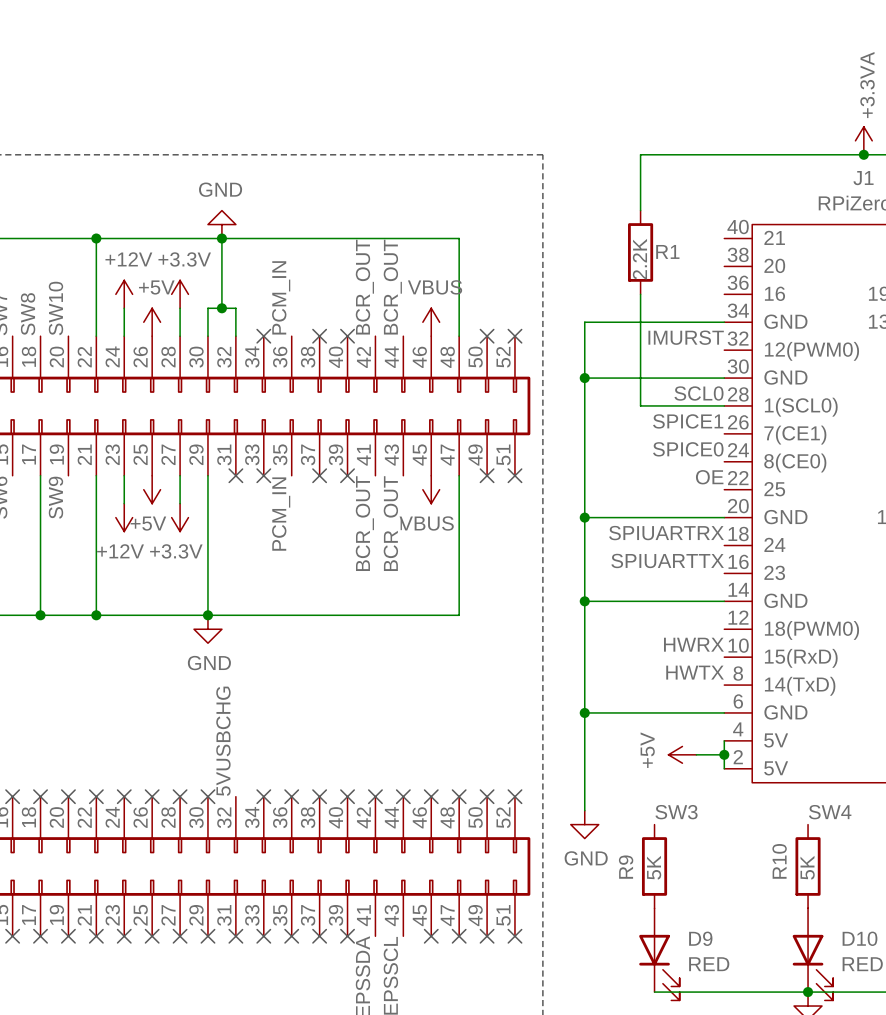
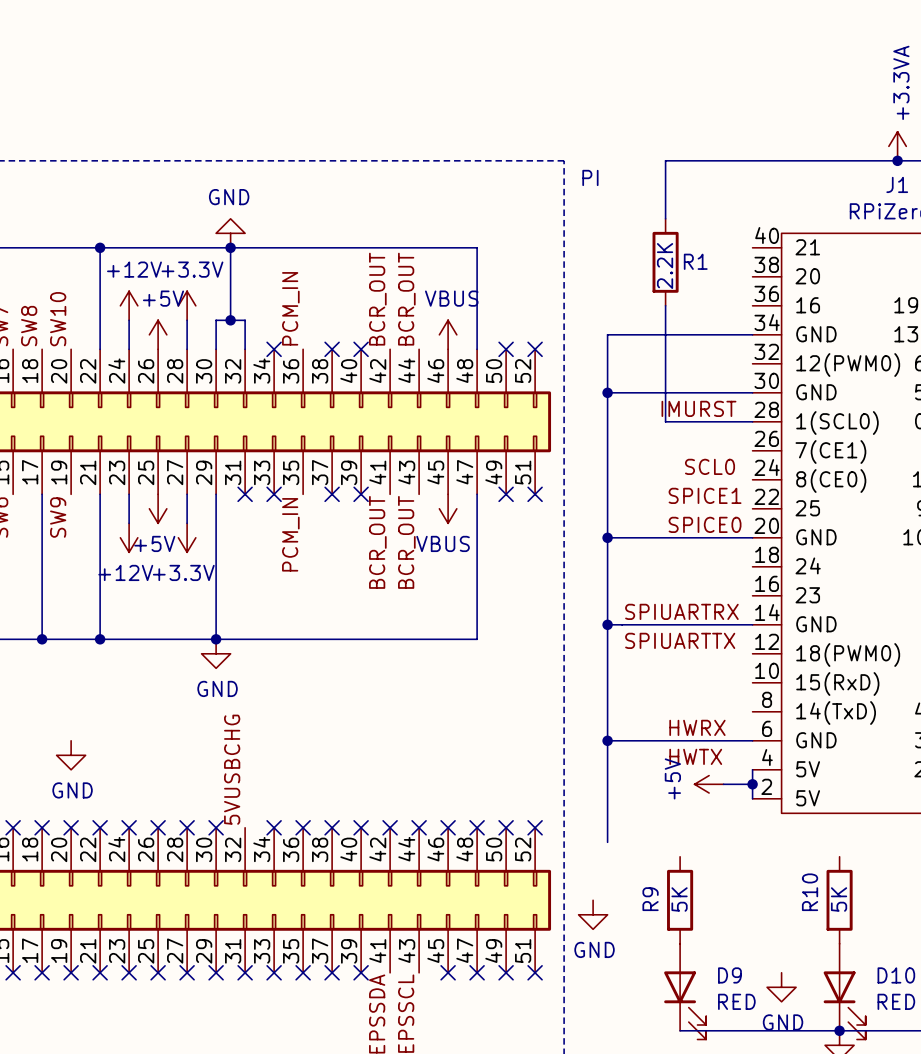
text: none -> PI (590, 177)
label position: IMURST (686, 337) -> IMURST (698, 408)
label position: SCL0 (698, 393) -> SCL0 (710, 466)
label position: SPICE1 (688, 421) -> SPICE1 (705, 495)
label position: SPICE0 (688, 449) -> SPICE0 (705, 524)
label: OE (709, 477) -> none
label position: SPIUARTRX (666, 533) -> SPIUARTRX (681, 611)
label position: SPIUARTTX (667, 560) -> SPIUARTTX (680, 640)
label position: HWRX (693, 644) -> HWRX (697, 727)
label position: HWTX (695, 672) -> HWTX (695, 756)
power symbol: none -> GND (71, 755)
label: SW3 (676, 812) -> none
label: SW4 (830, 812) -> none
power symbol position: GND (584, 824) -> GND (593, 914)
power symbol: none -> GND (781, 987)

